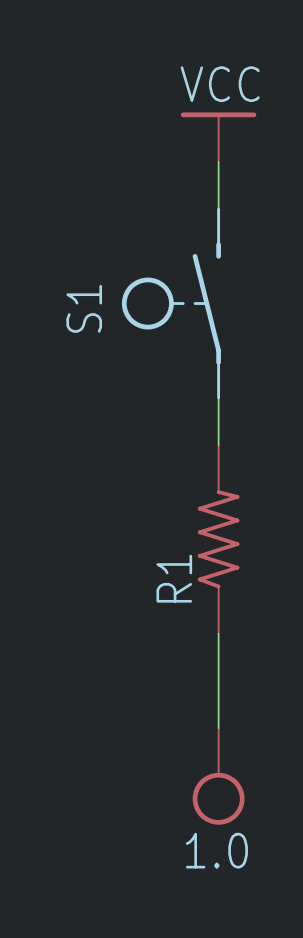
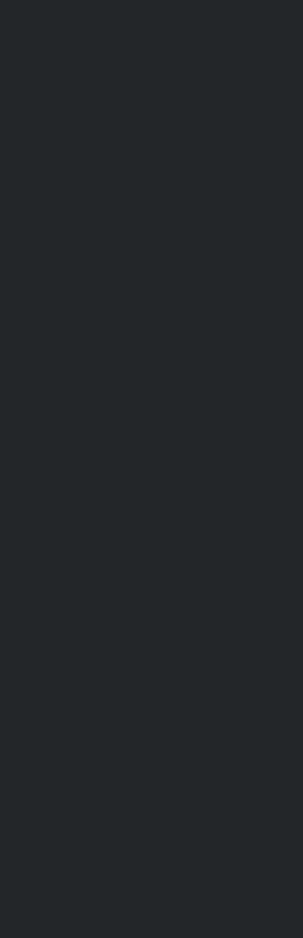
power symbol: VCC (218, 137) -> none
wire: (218, 162) (218, 209) -> none
S1: (171, 303) -> none
wire: (218, 397) (218, 445) -> none
R1: (218, 539) -> none
wire: (218, 633) (218, 728) -> none
power symbol: 1.0 (218, 776) -> none

